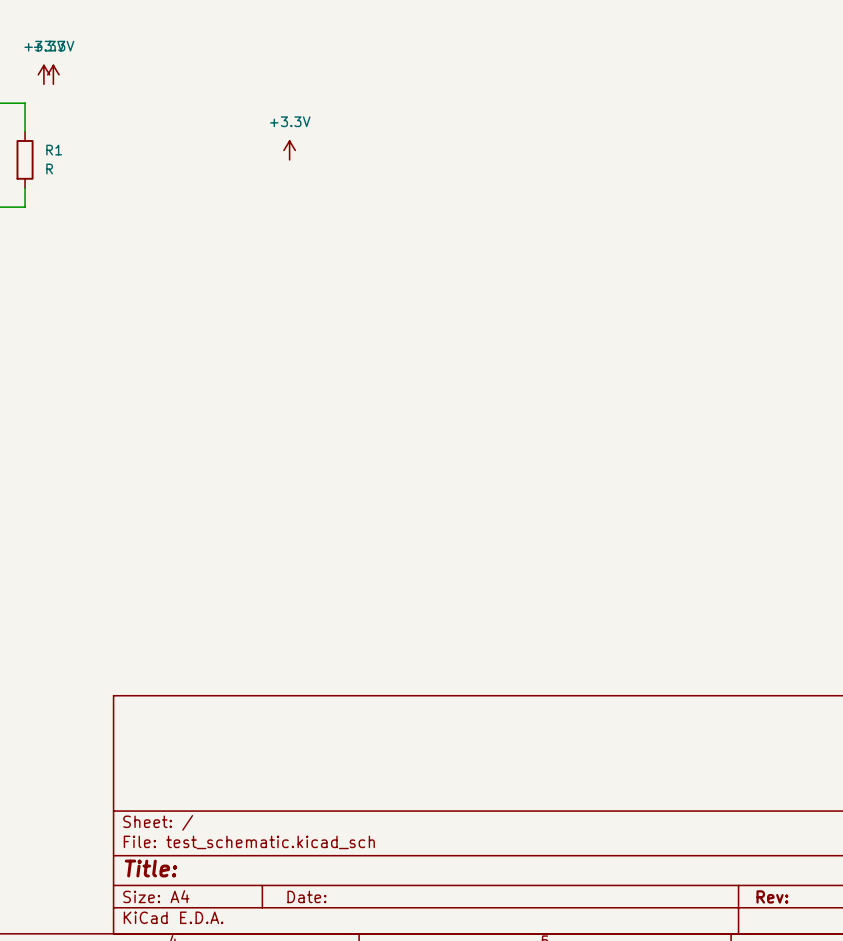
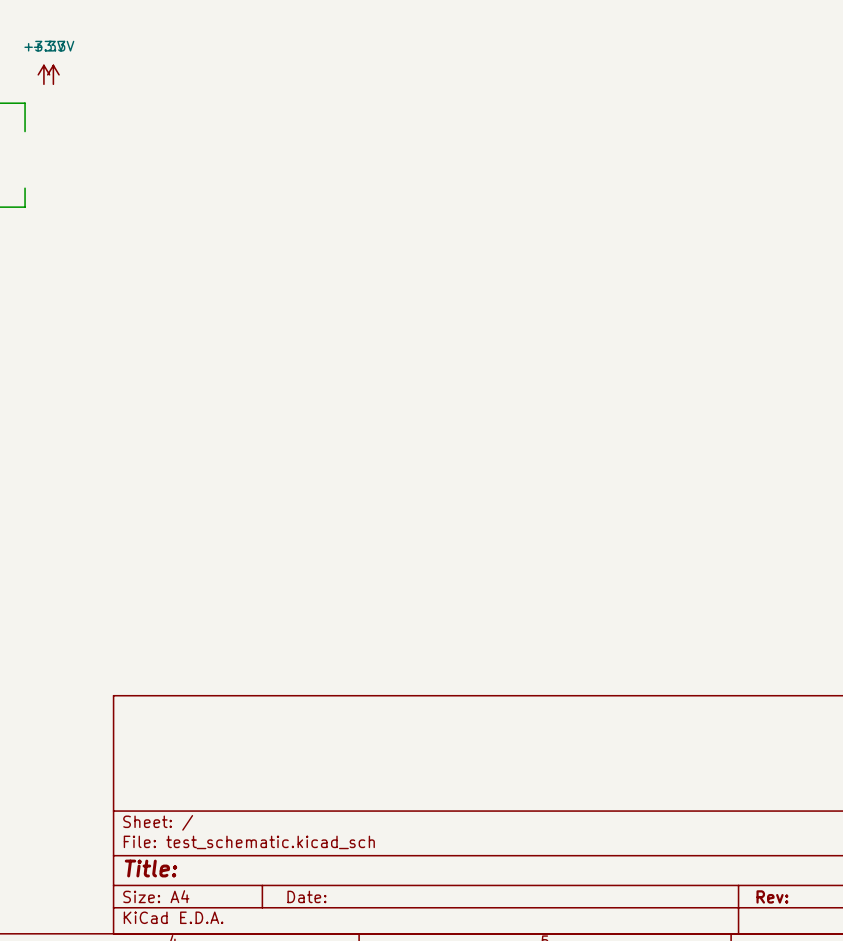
power symbol: +3.3V (289, 150) -> none
R1: R (25, 159) -> none

